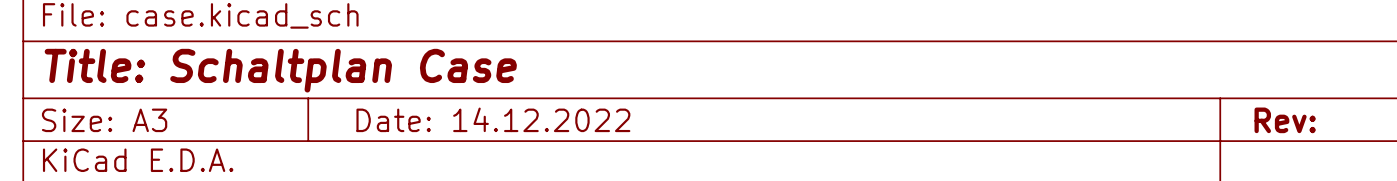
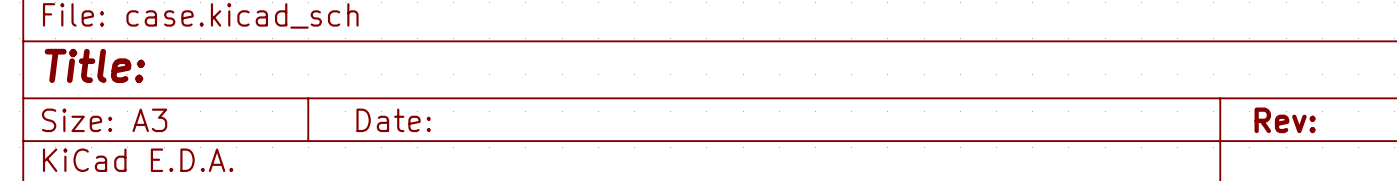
title block: Title: Schaltplan Case (280, 70) -> Title: (94, 65)
title block: Date: 14.12.2022 (493, 119) -> Date: (393, 120)

